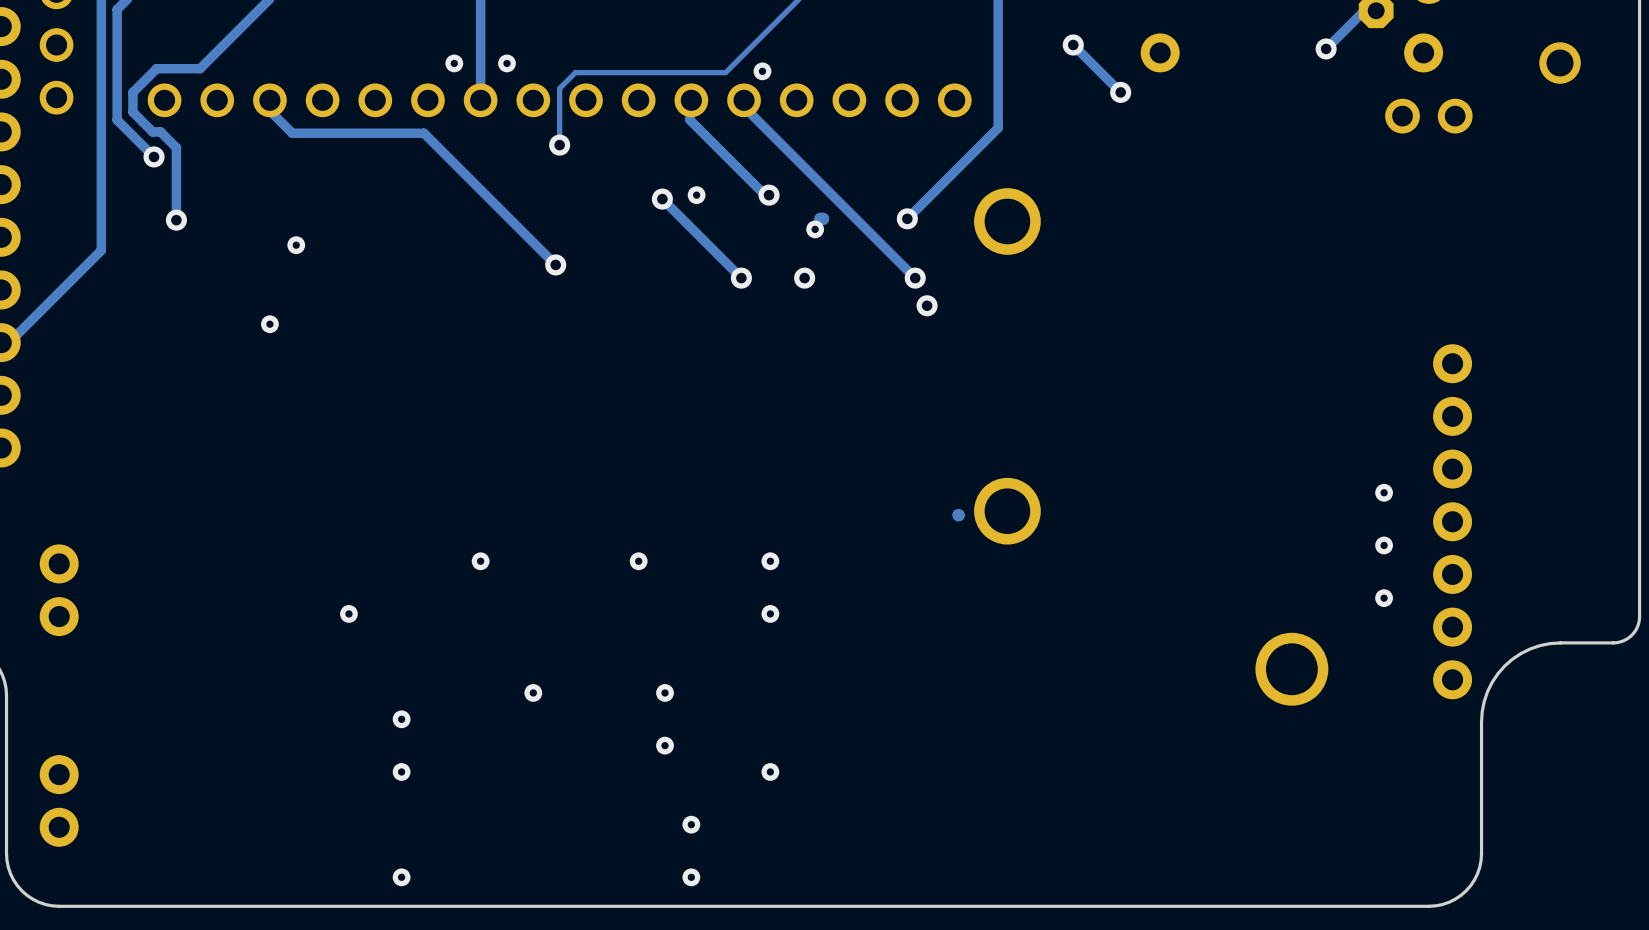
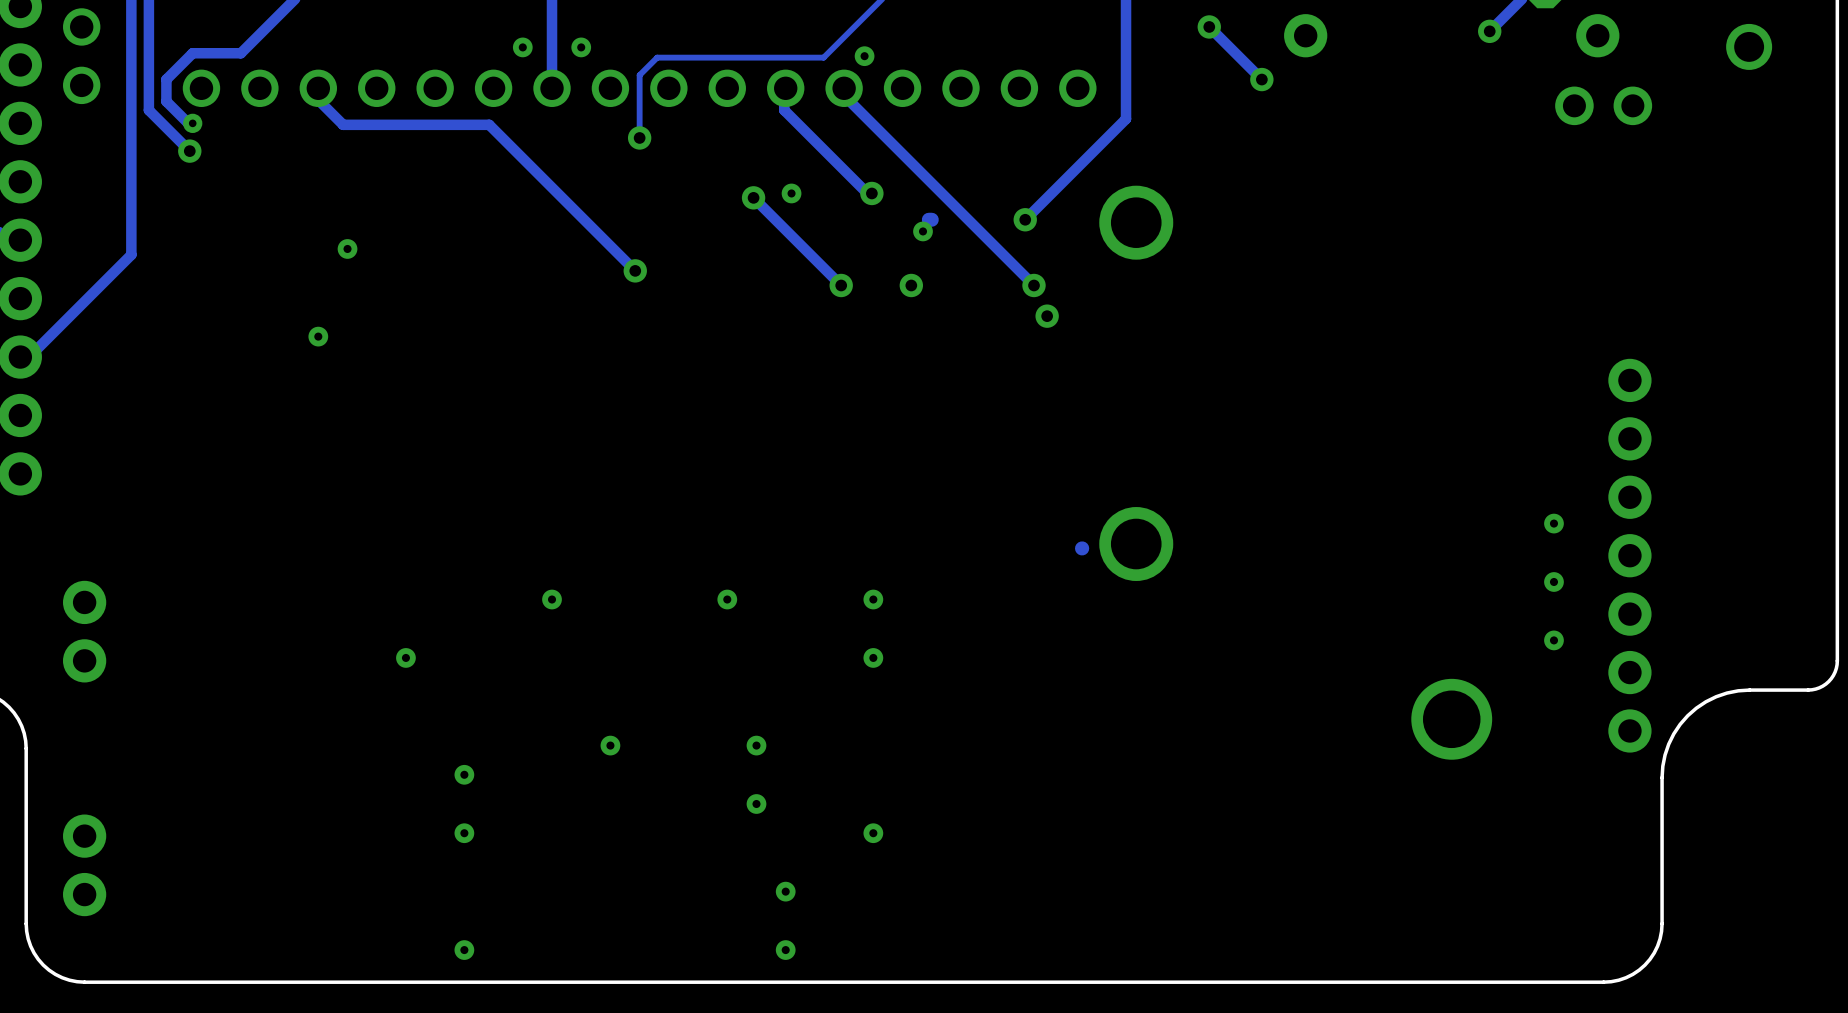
track: (156, 131) (160, 131) (176, 147) (176, 220) -> none
via: none -> (192, 123)
via: (176, 220) -> none

